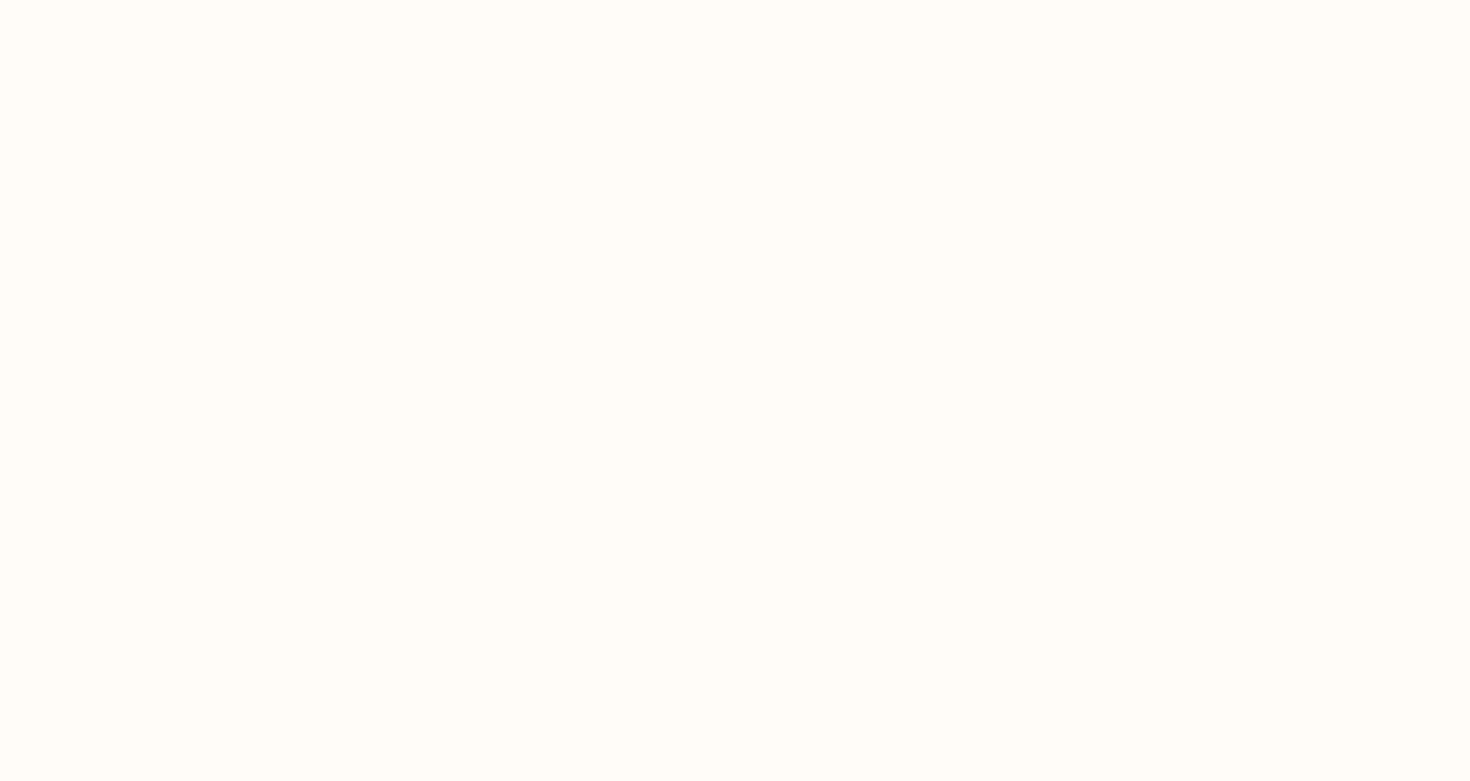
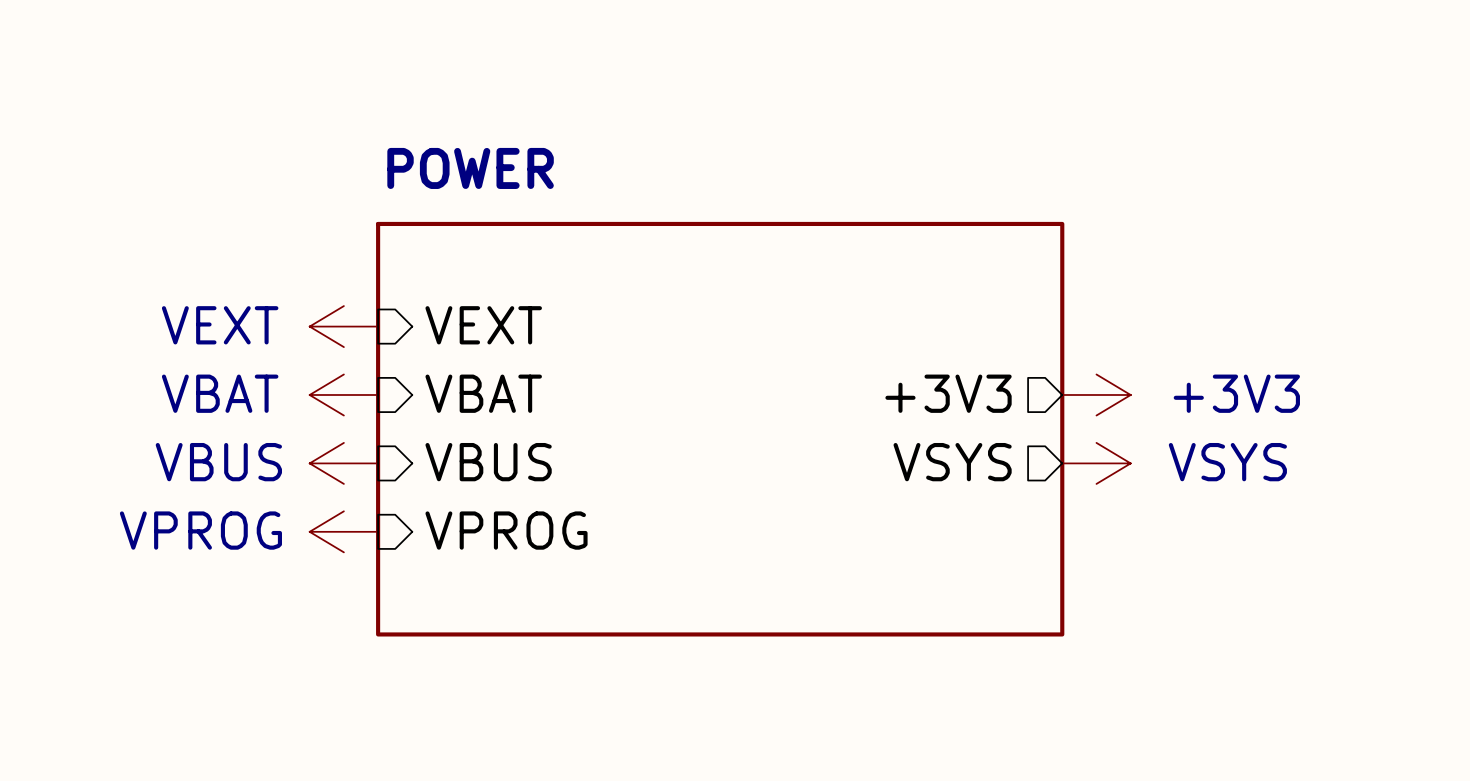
sheet pin: none -> VEXT (483, 325)
power symbol: none -> VEXT (343, 326)
sheet pin: none -> VBAT (483, 393)
sheet pin: none -> +3V3 (948, 393)
power symbol: none -> VBAT (343, 394)
power symbol: none -> +3V3 (1096, 394)
sheet POWER: none -> (720, 429)
sheet pin: none -> VBUS (488, 462)
sheet pin: none -> VSYS (952, 462)
power symbol: none -> VBUS (343, 463)
power symbol: none -> VSYS (1096, 463)
sheet pin: none -> VPROG (506, 530)
power symbol: none -> VPROG (343, 531)

